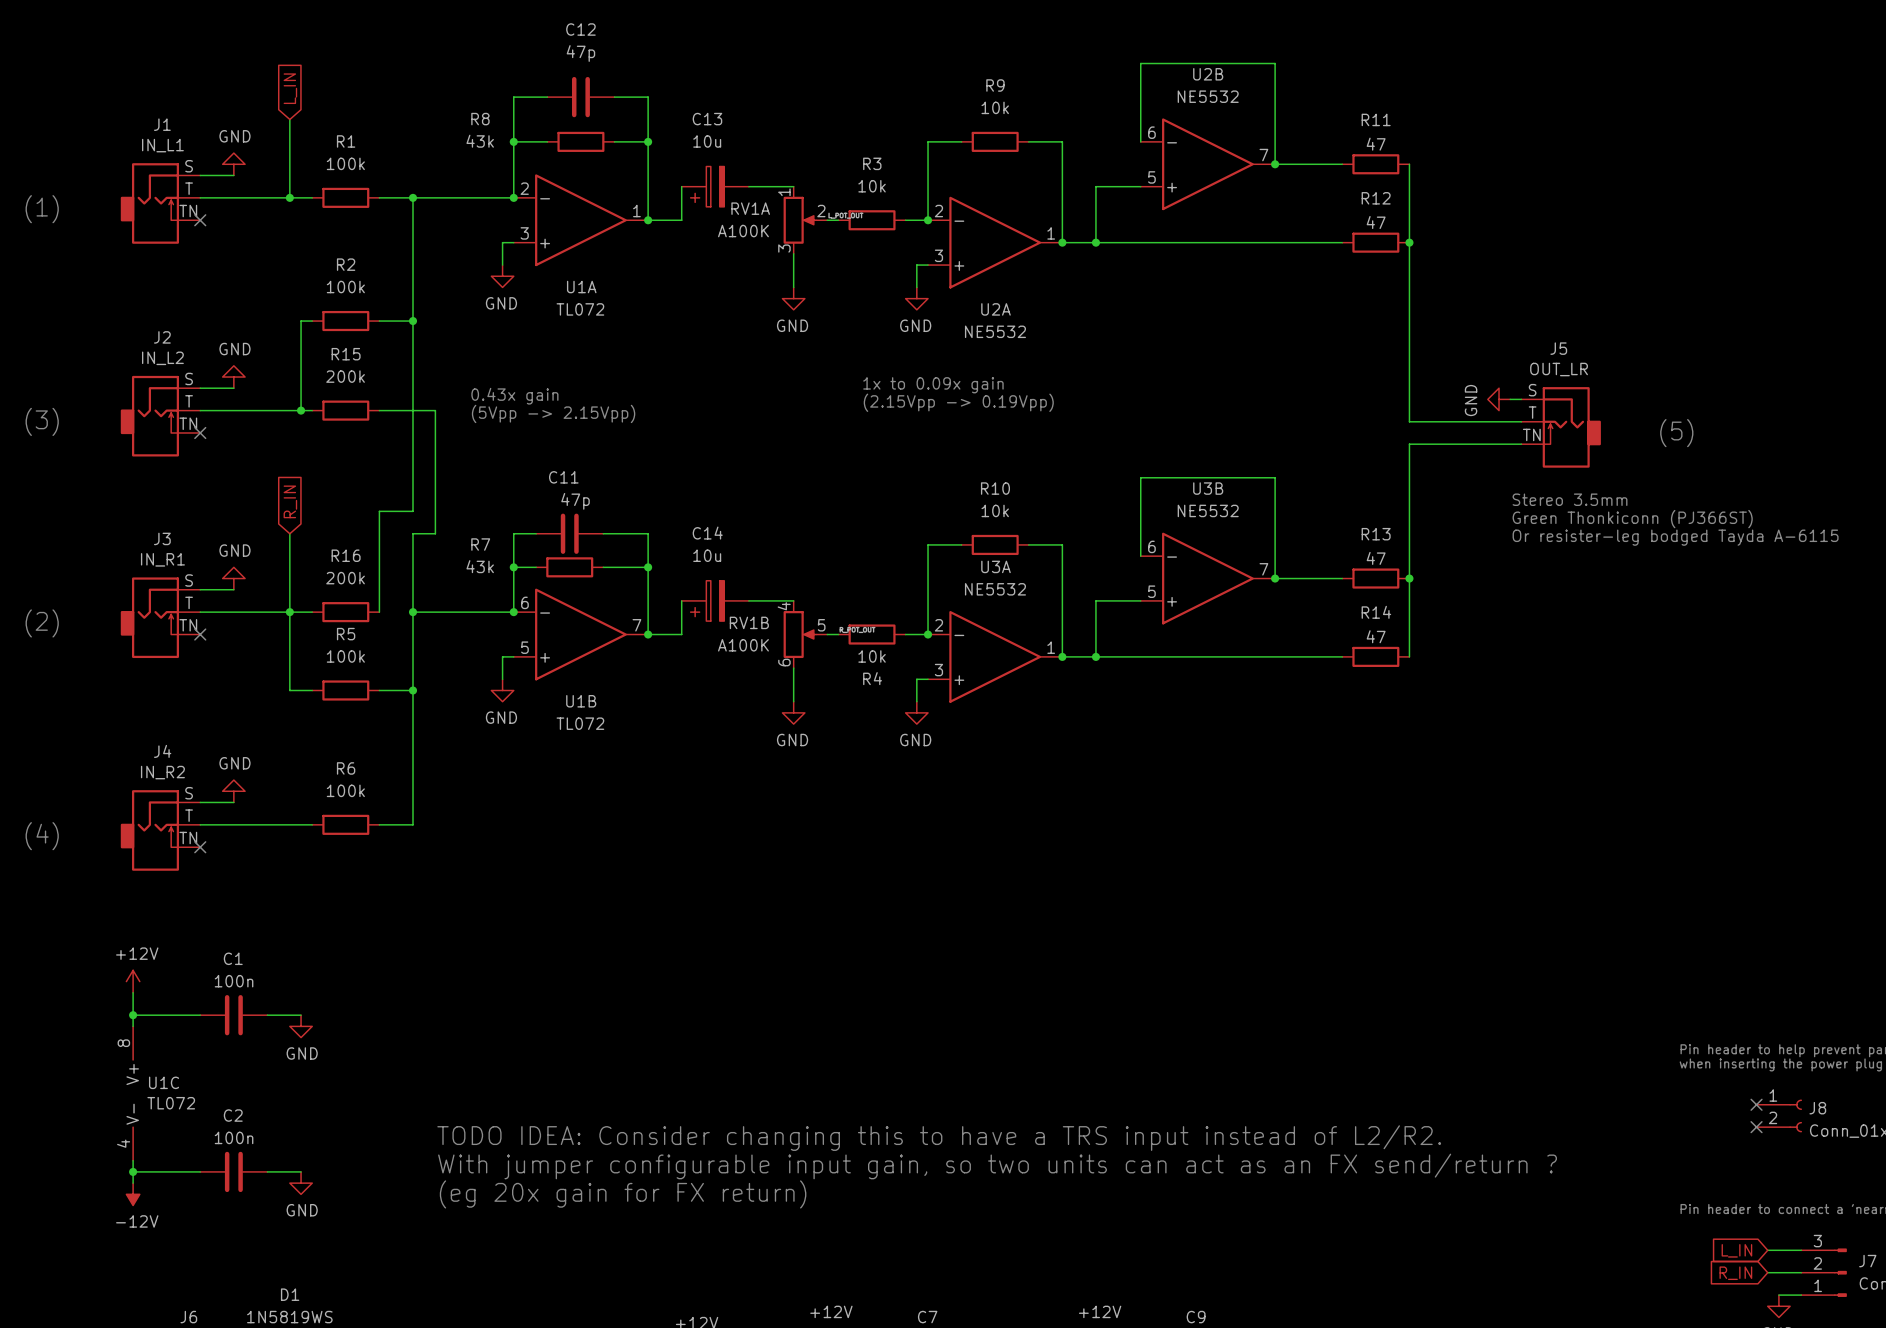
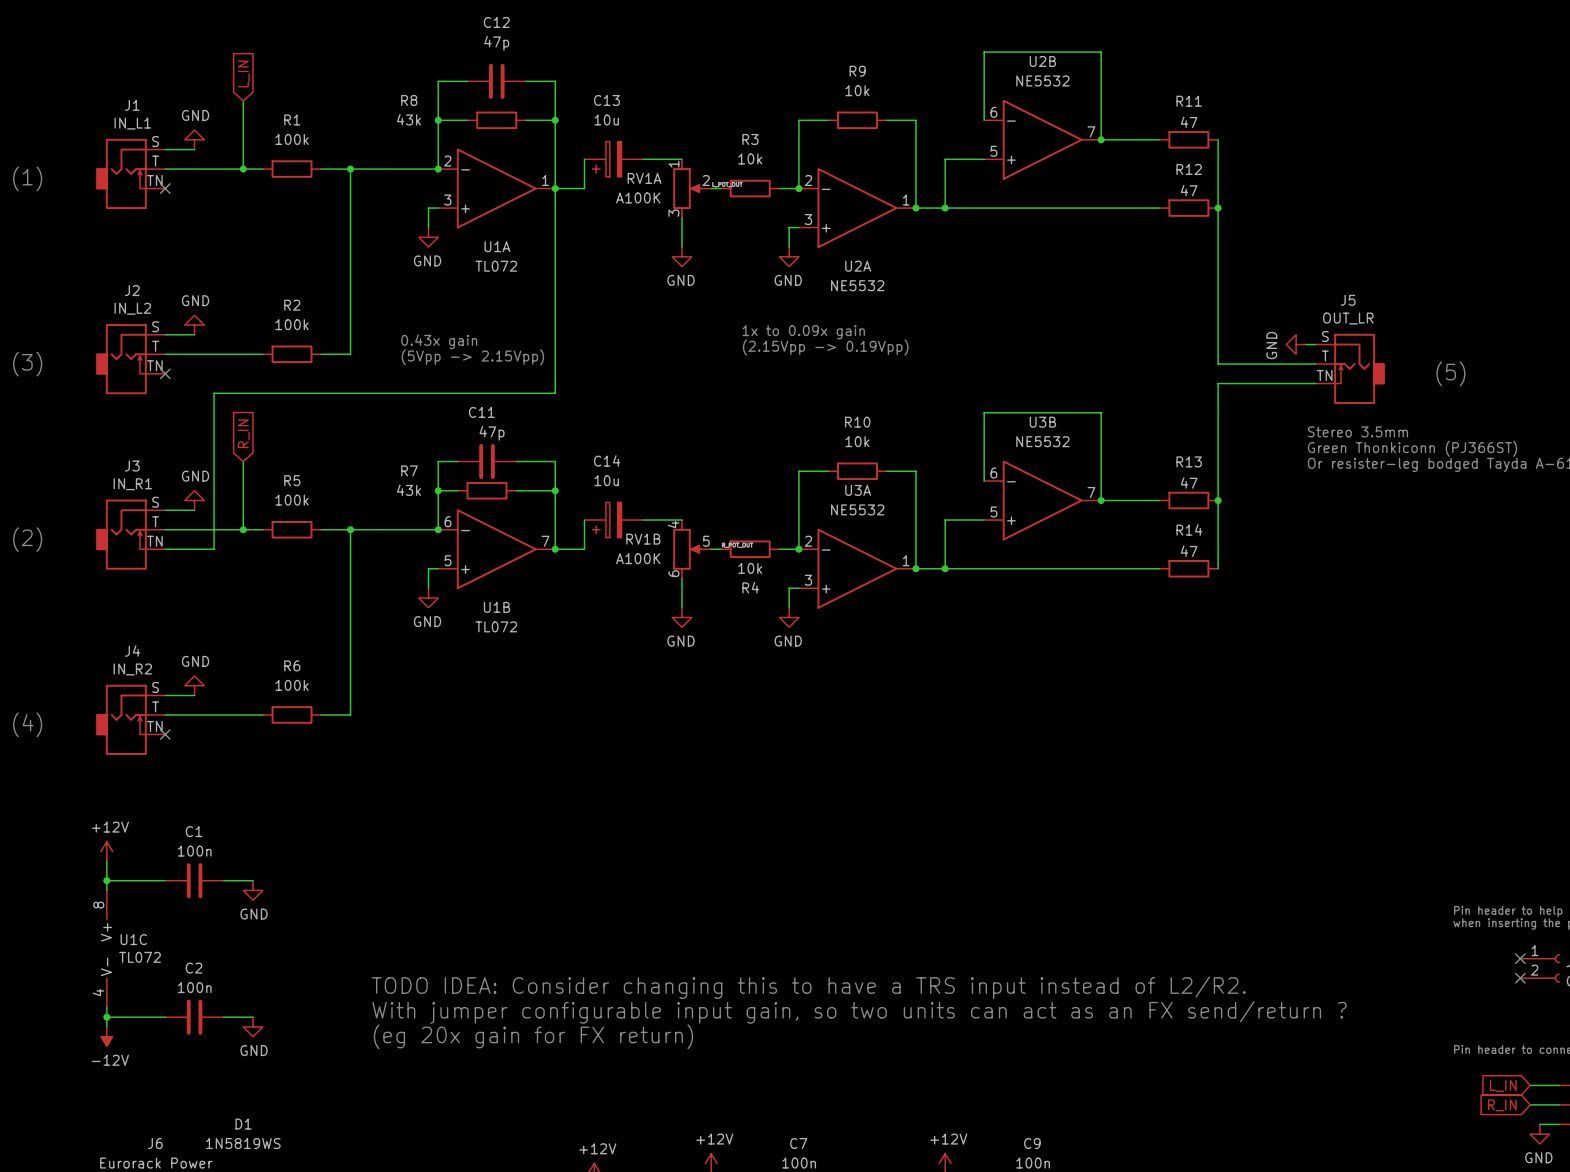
wire: none -> (555, 188) (555, 393) (214, 393) (214, 549) (165, 549)
wire: (312, 321) (301, 321) (301, 410) -> none
R2: 100k (345, 321) -> none
wire: (379, 321) (413, 321) -> none
junction: (413, 321) -> none
R15 name: R15 (346, 354) -> R2 (292, 305)
R15 value: 200k (345, 376) -> 100k (292, 324)
junction: (301, 410) -> none
R16 name: R16 (346, 555) -> R5 (292, 480)
R16 value: 200k (345, 578) -> 100k (292, 500)
wire: (289, 612) (289, 690) (312, 690) -> none
wire: (379, 612) (379, 511) (413, 511) (413, 410) (435, 410) (435, 533) (413, 533) (413, 612) -> (321, 529) (350, 529)
no-connect mark: (200, 634) -> none
R5: 100k (345, 690) -> none
wire: (379, 690) (413, 690) -> none
junction: (413, 690) -> none

